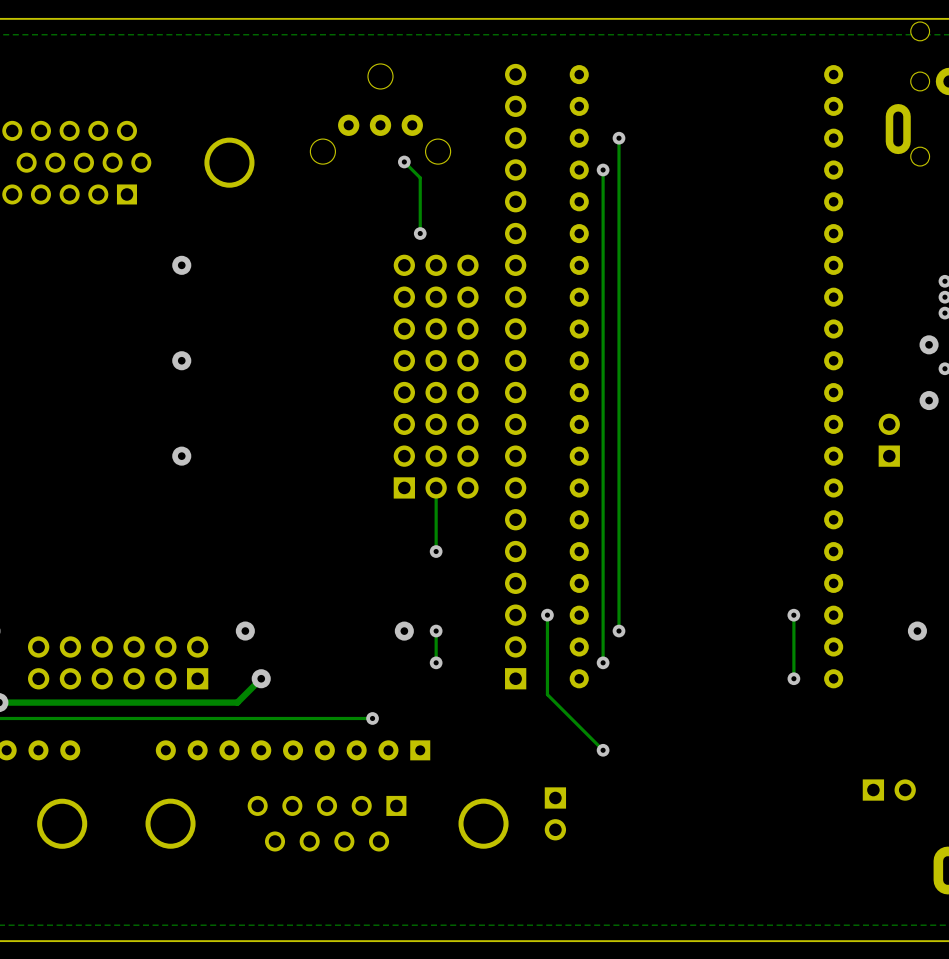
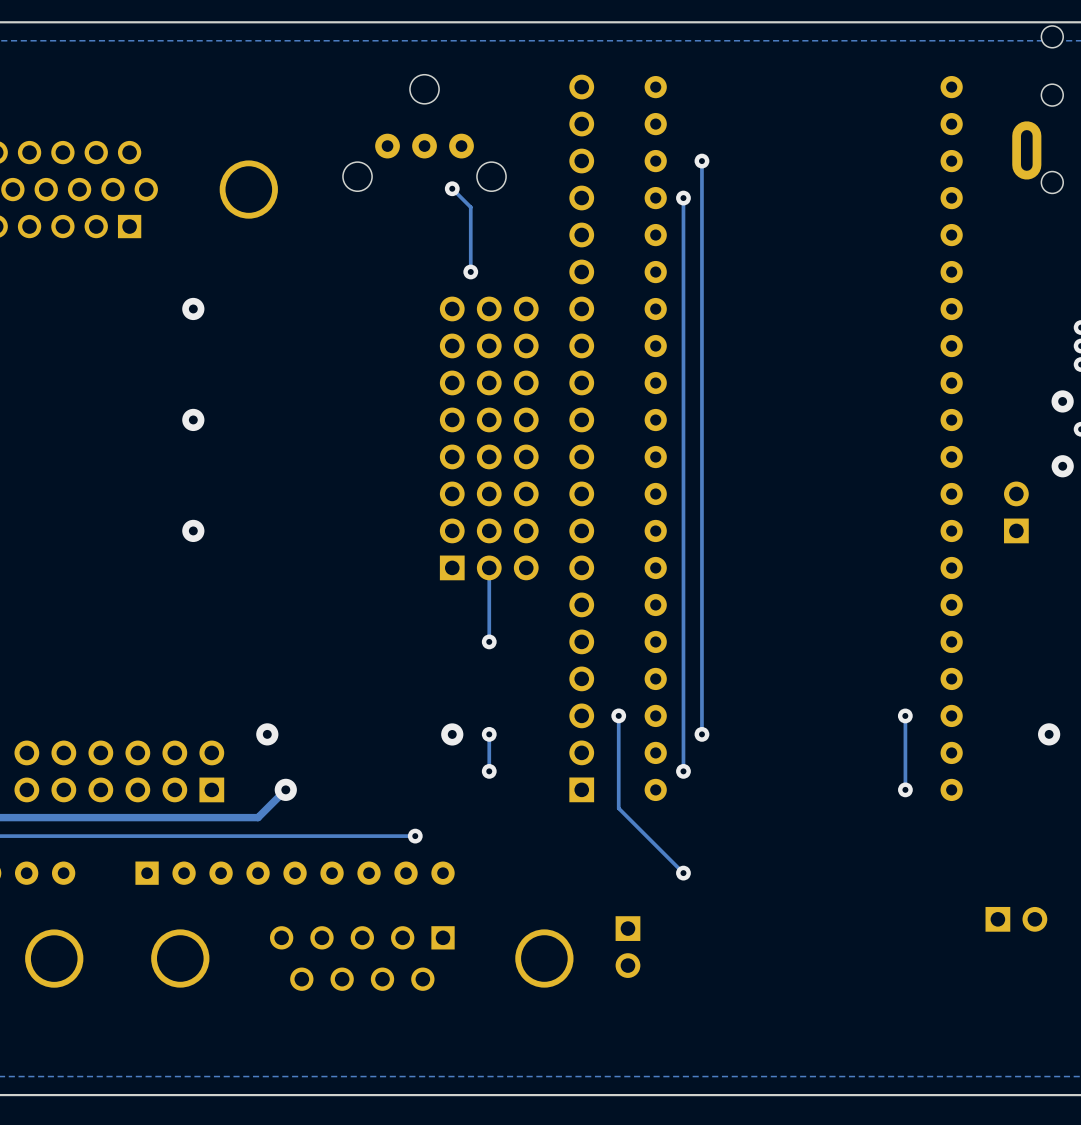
part rotation: 0° (293, 750) -> 180° (295, 873)

